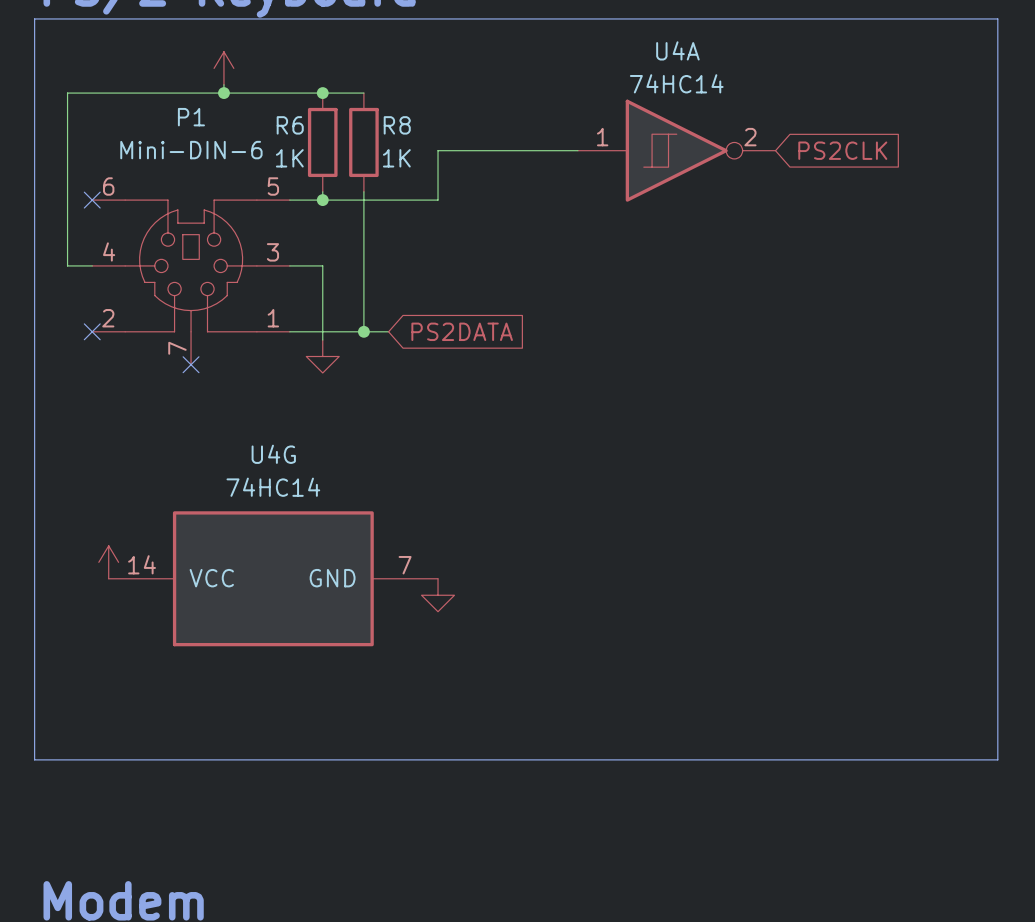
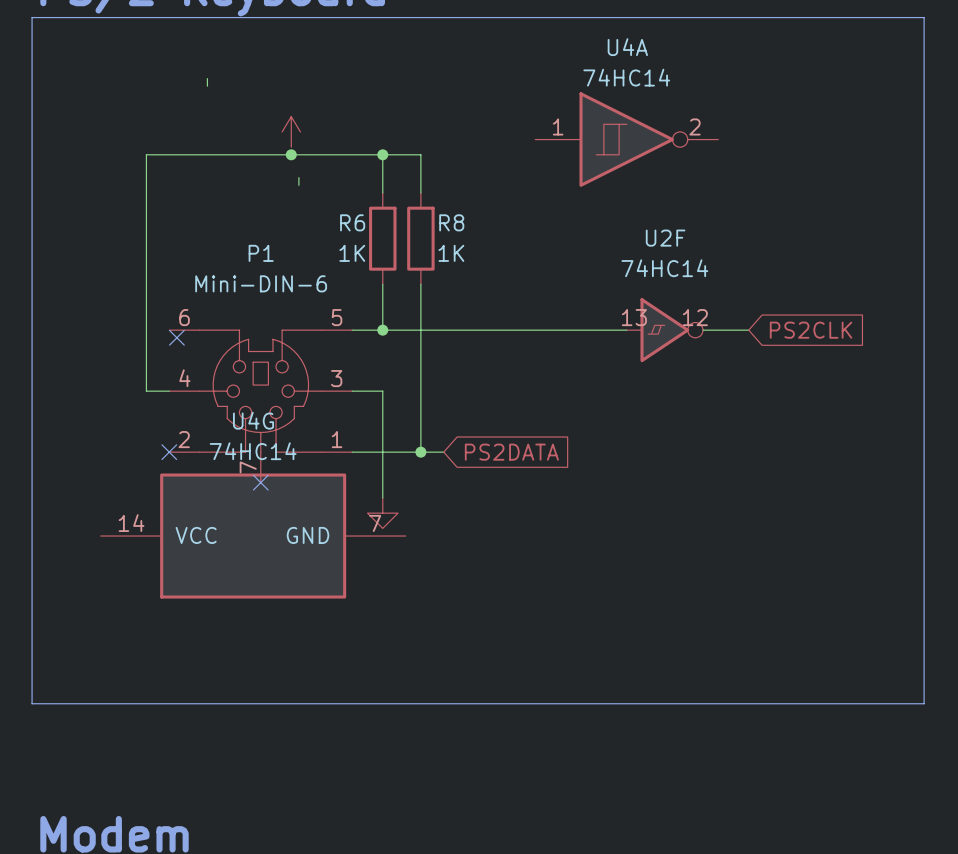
power symbol position: (223, 68) -> (291, 131)
junction: (223, 93) -> none
junction: (322, 93) -> none
wire: (363, 93) (67, 93) (67, 265) (92, 265) -> none
R6 position: (322, 142) -> (382, 238)
R8 position: (363, 142) -> (420, 238)
wire: (577, 150) (438, 150) (438, 200) (289, 200) -> none
global label position: PS2CLK (842, 150) -> PS2CLK (811, 330)
wire: none -> (382, 154) (382, 192)
junction: none -> (382, 154)
wire: (363, 191) (363, 331) -> none
no-connect mark: (92, 200) -> none
junction position: (322, 200) -> (291, 154)
wire: none -> (420, 192) (420, 154) (146, 154) (146, 391) (169, 391)
wire: (289, 265) (322, 265) (322, 340) -> none
P1 position: (191, 282) -> (260, 406)
wire: none -> (382, 284) (382, 330)
wire: none -> (420, 284) (420, 452)
no-connect mark: (92, 331) -> none
wire: (289, 331) (388, 331) -> (352, 452) (443, 452)
junction position: (363, 331) -> (382, 330)
global label position: PS2DATA (462, 331) -> PS2DATA (511, 452)
power symbol: (322, 356) -> none
wire: none -> (352, 330) (626, 330)
U2F: none -> 74HC14 (664, 330)
wire: none -> (702, 330) (748, 330)
wire: none -> (352, 391) (382, 391) (382, 497)
no-connect mark: none -> (169, 452)
junction: none -> (420, 452)
no-connect mark: none -> (260, 482)
power symbol: (108, 562) -> none
power symbol position: (438, 595) -> (382, 513)

